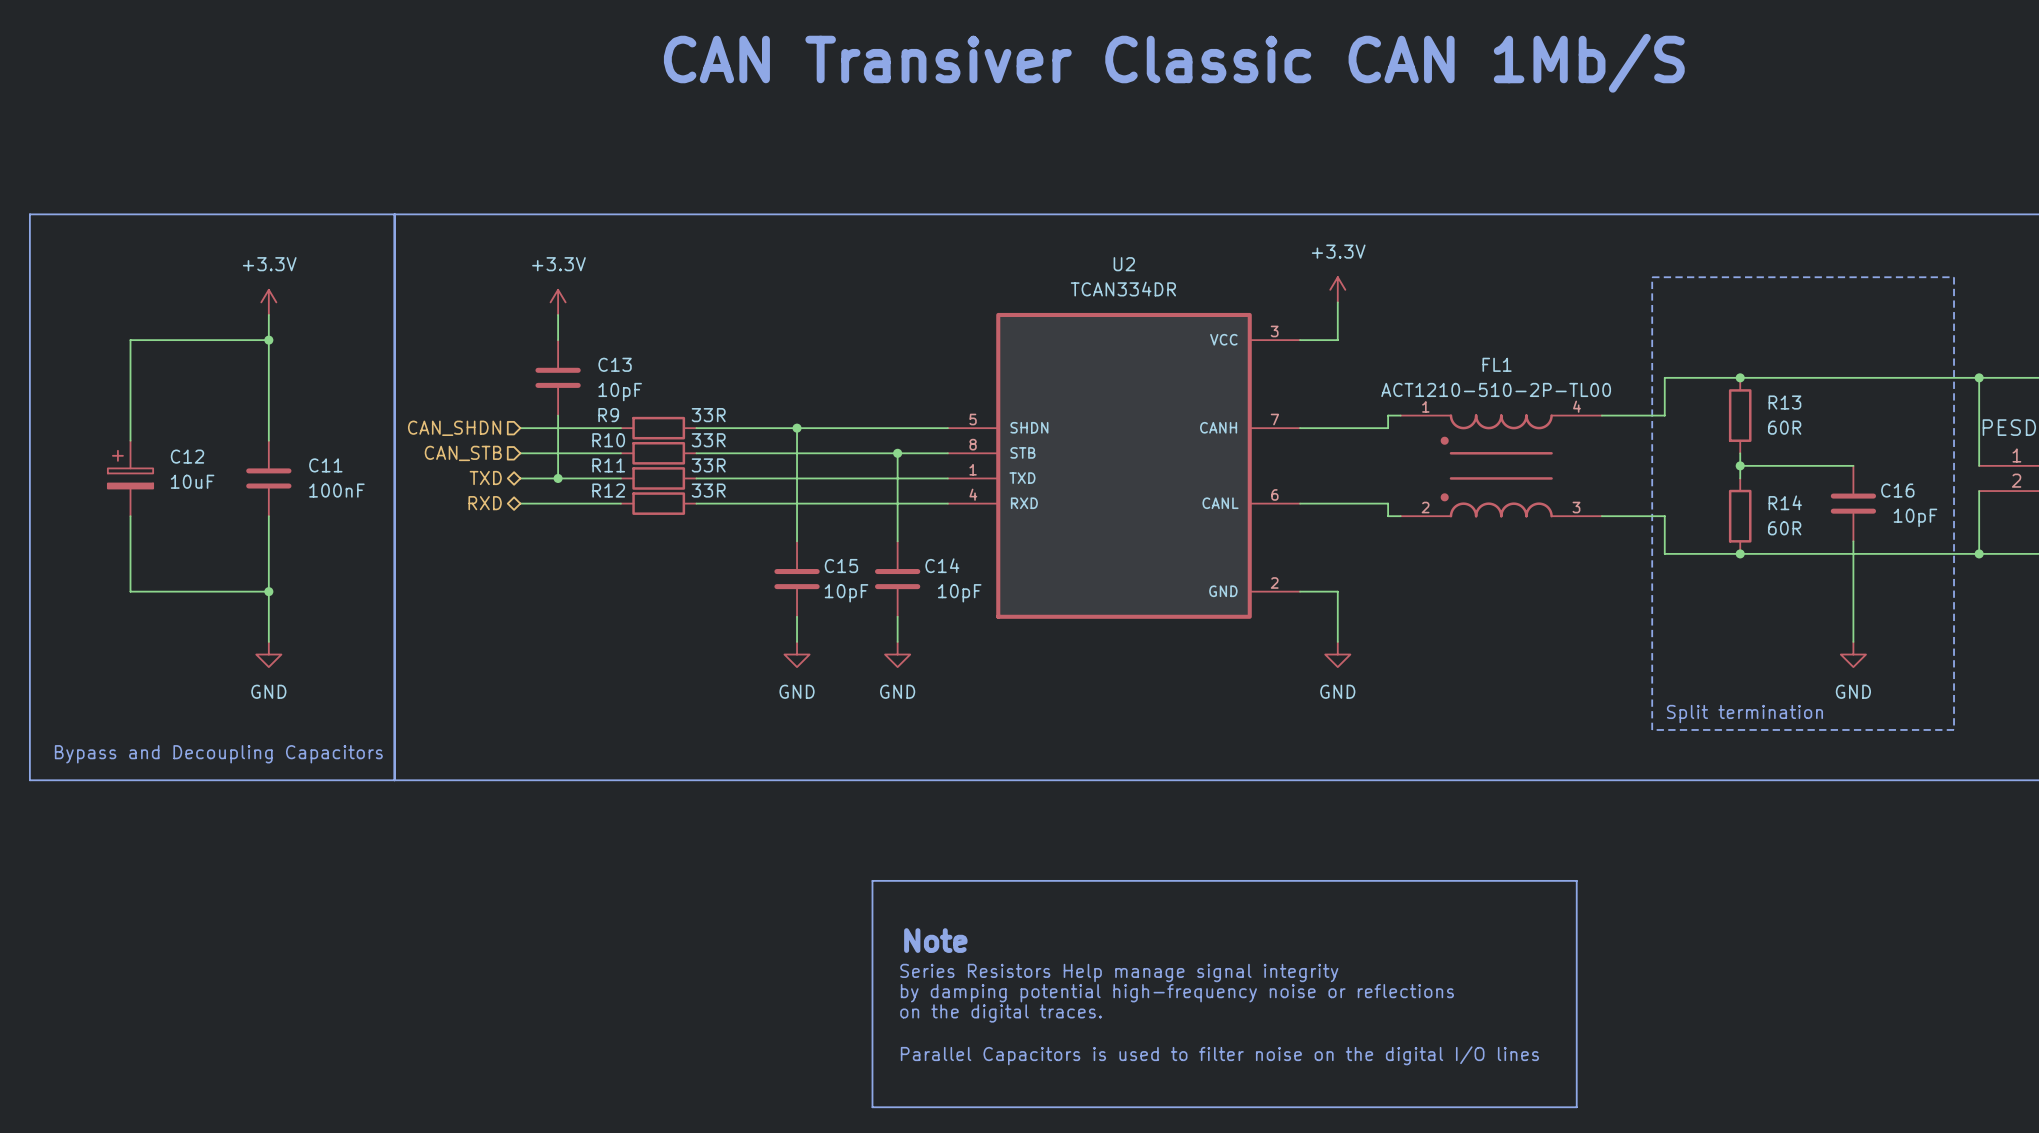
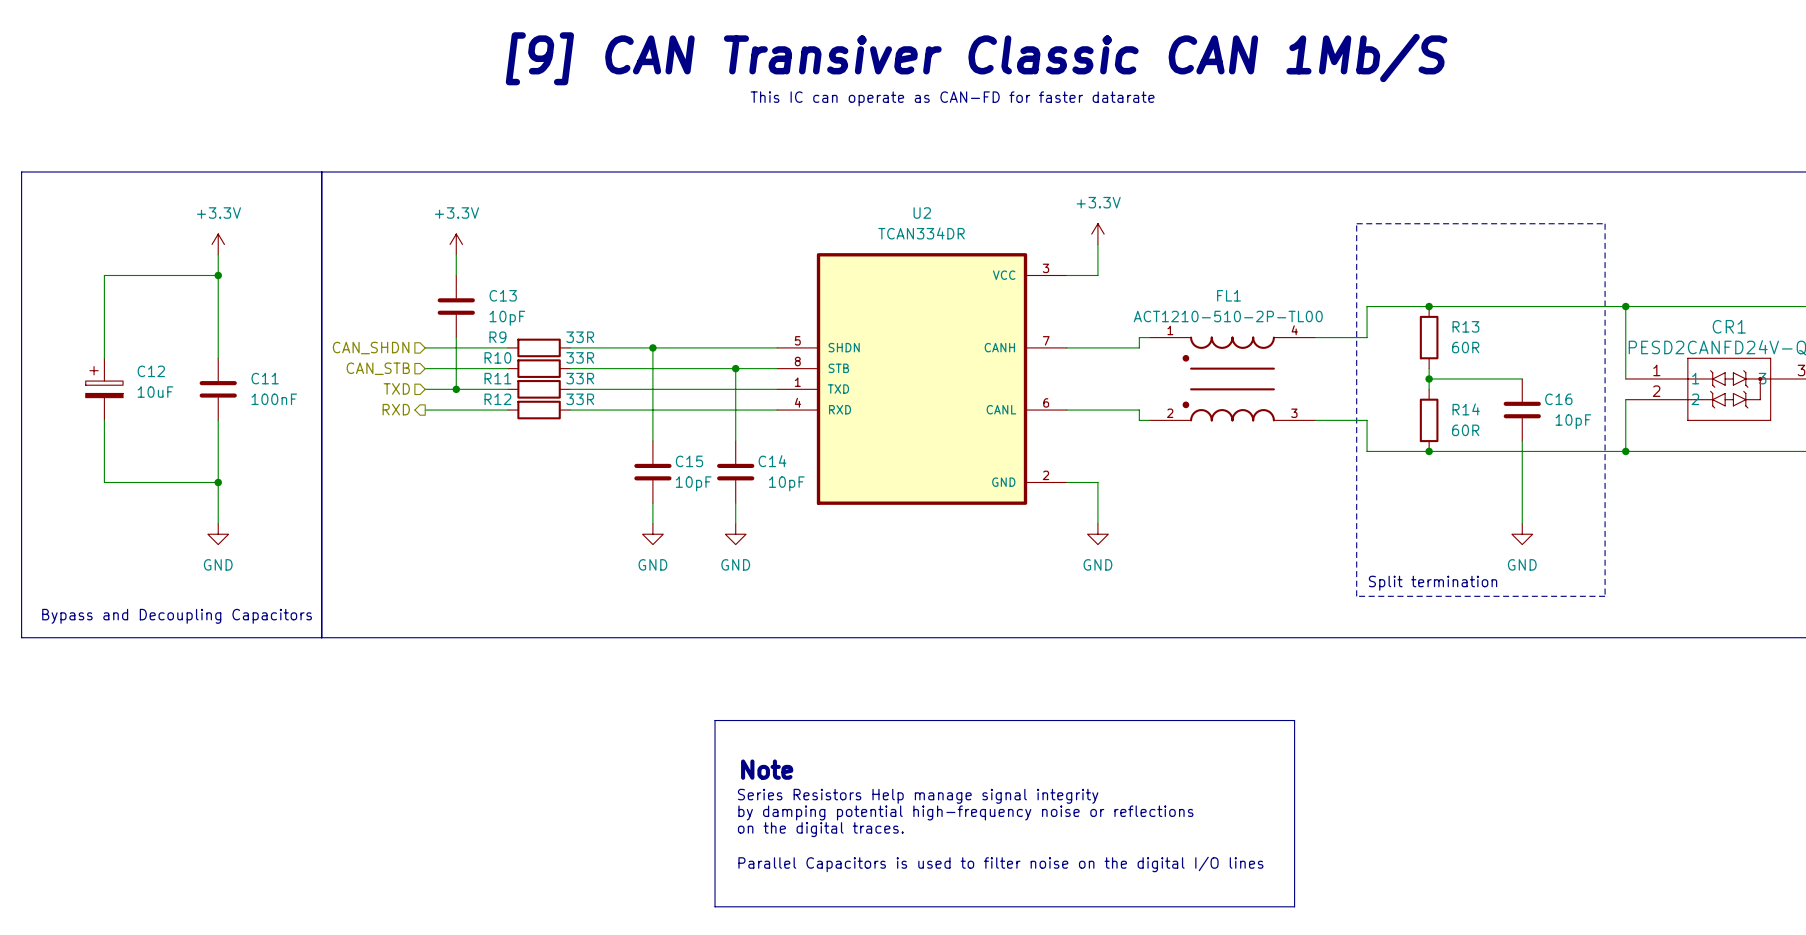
text: CAN Transiver Classic CAN 1Mb/S (1174, 63) -> [9] CAN Transiver Classic CAN 1Mb/S (976, 58)
text: none -> This IC can operate as CAN-FD for faster datarate (952, 98)
hierarchical label shape: bidirectional (485, 477) -> input (396, 388)
hierarchical label shape: bidirectional (485, 503) -> output (396, 409)

